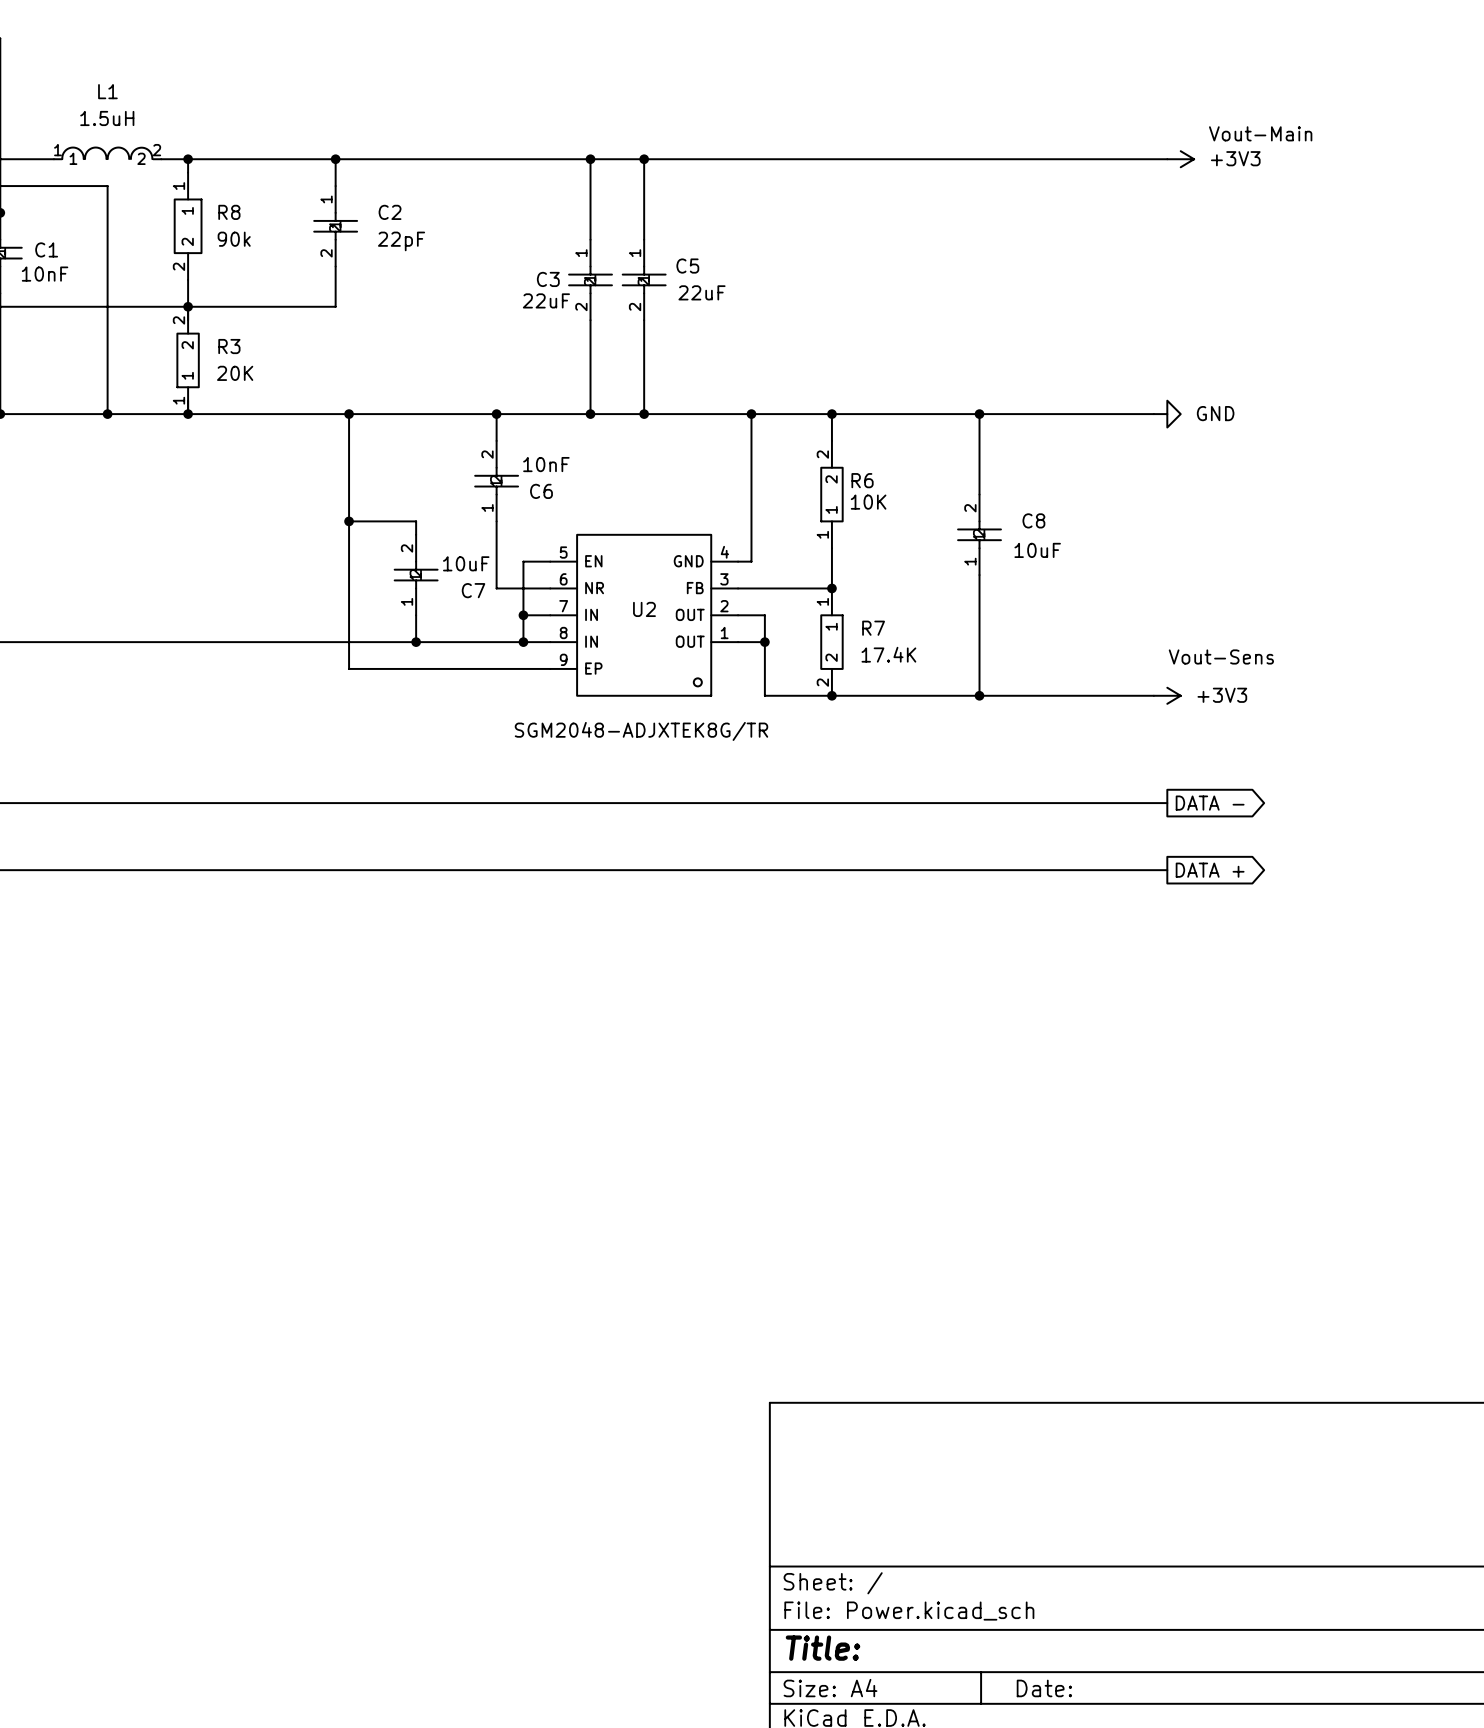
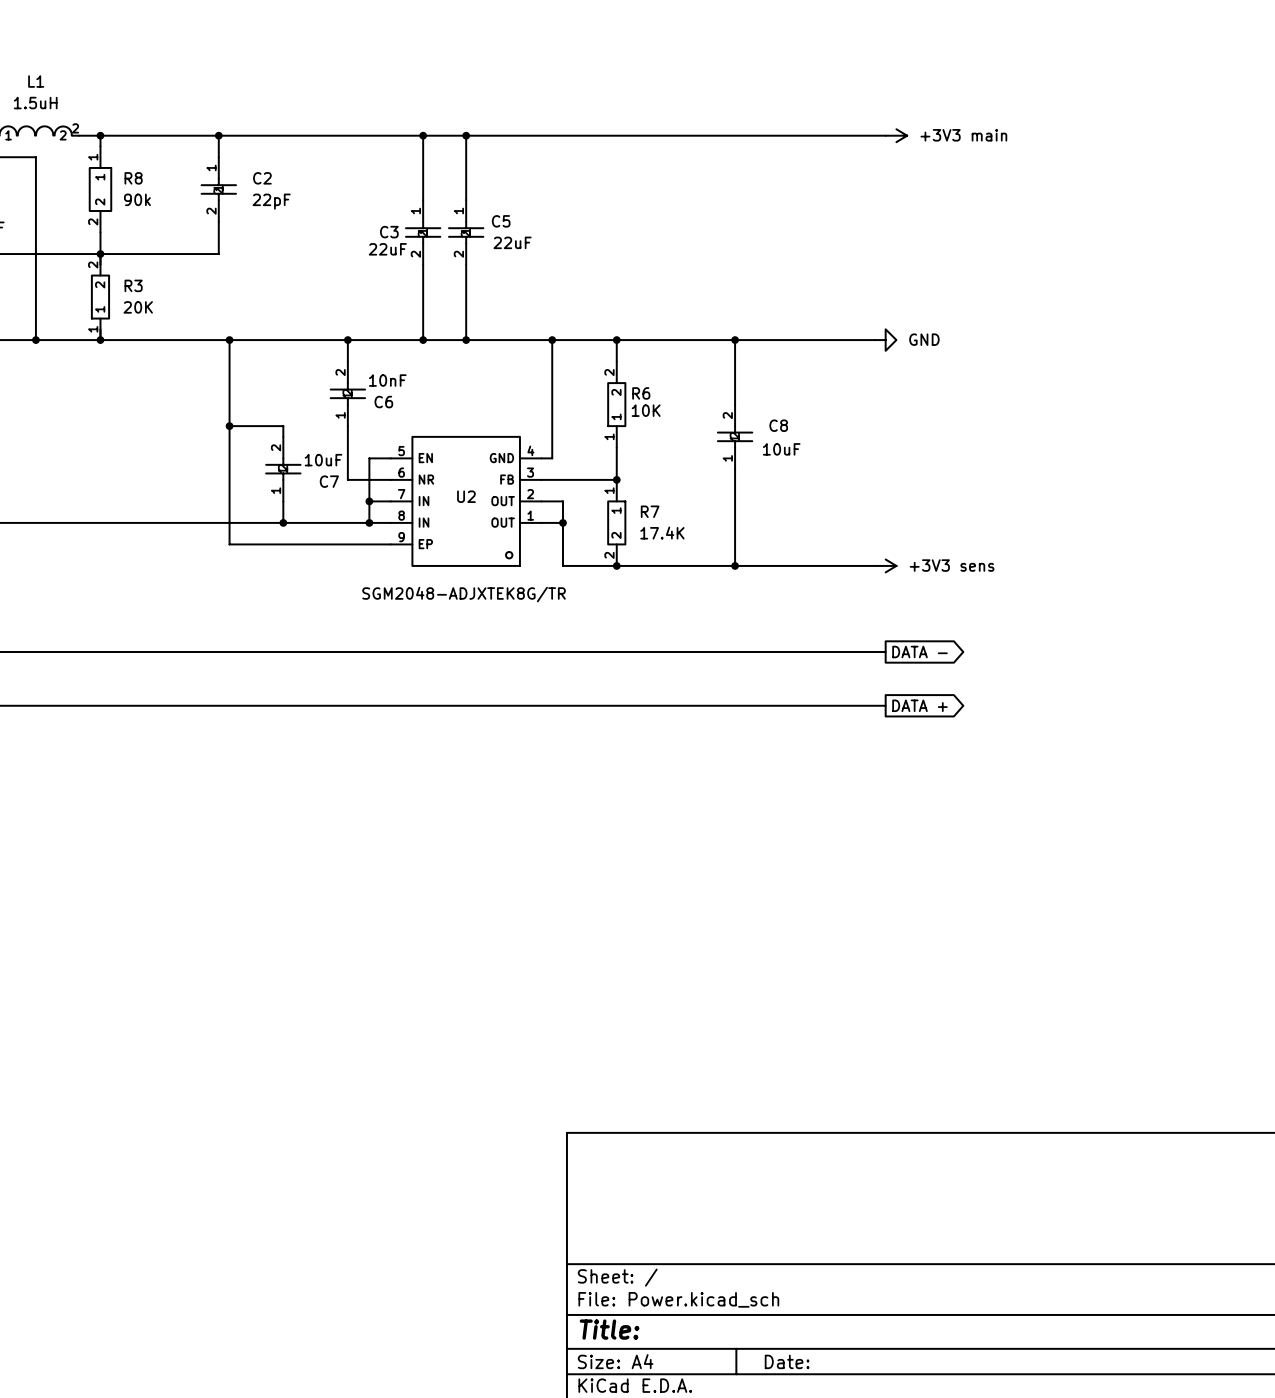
label: Vout-Main (1260, 133) -> none
power symbol: +3V3 (1180, 159) -> +3V3 main (896, 135)
label: Vout-Sens (1221, 656) -> none
power symbol: +3V3 (1167, 695) -> +3V3 sens (885, 565)

